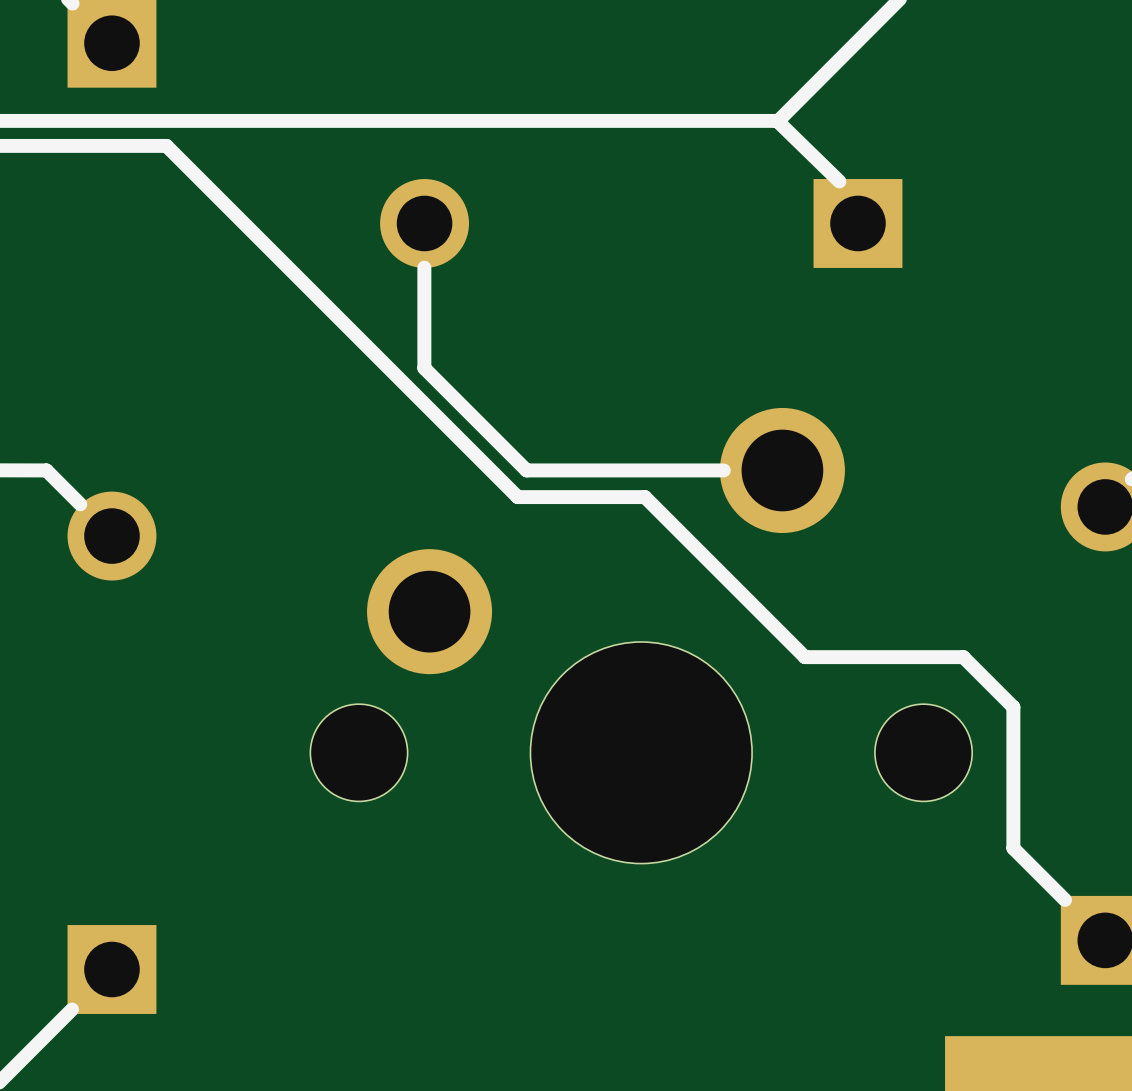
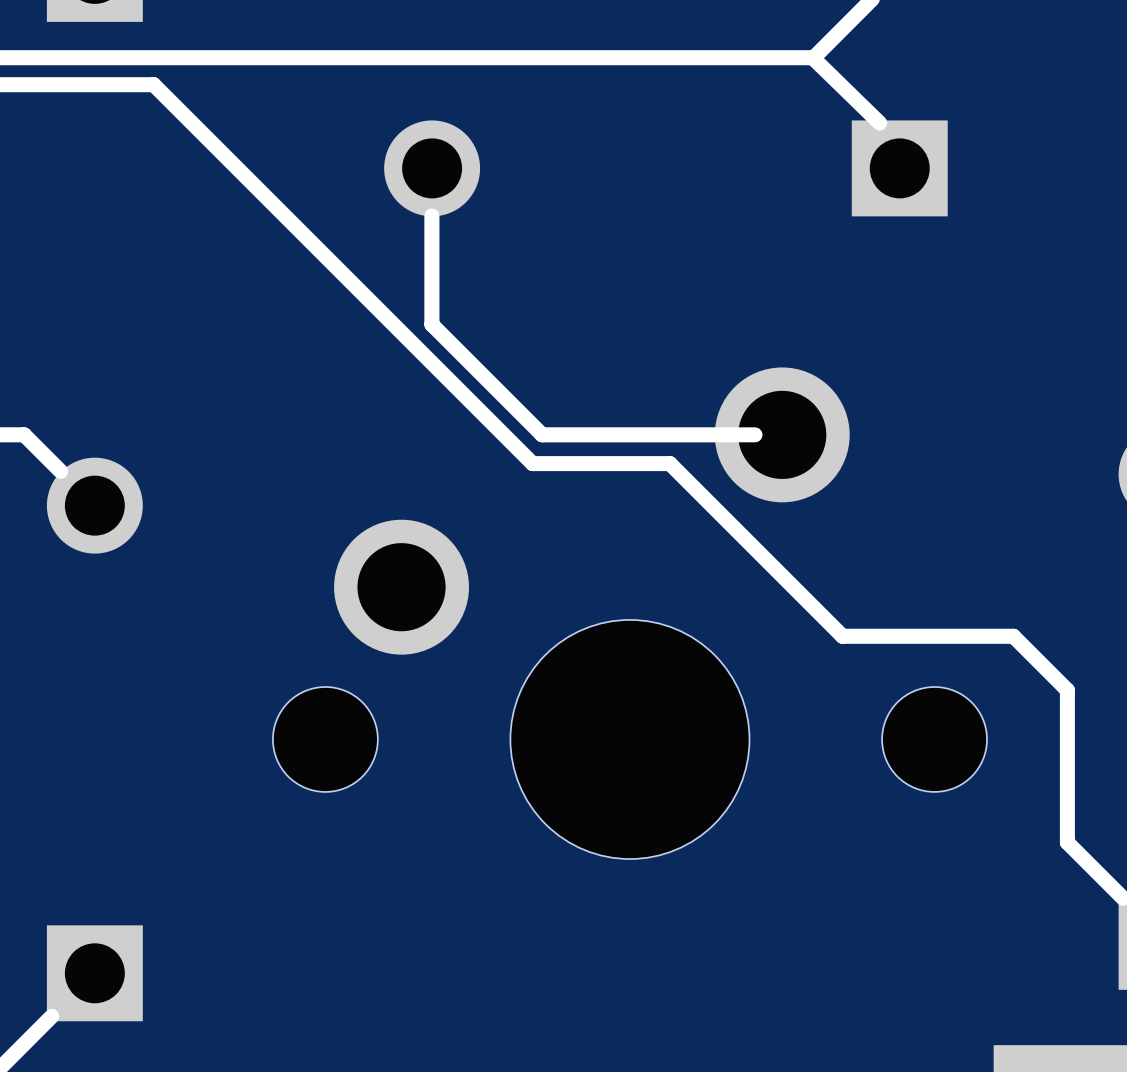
part position: (641, 635) -> (629, 613)

